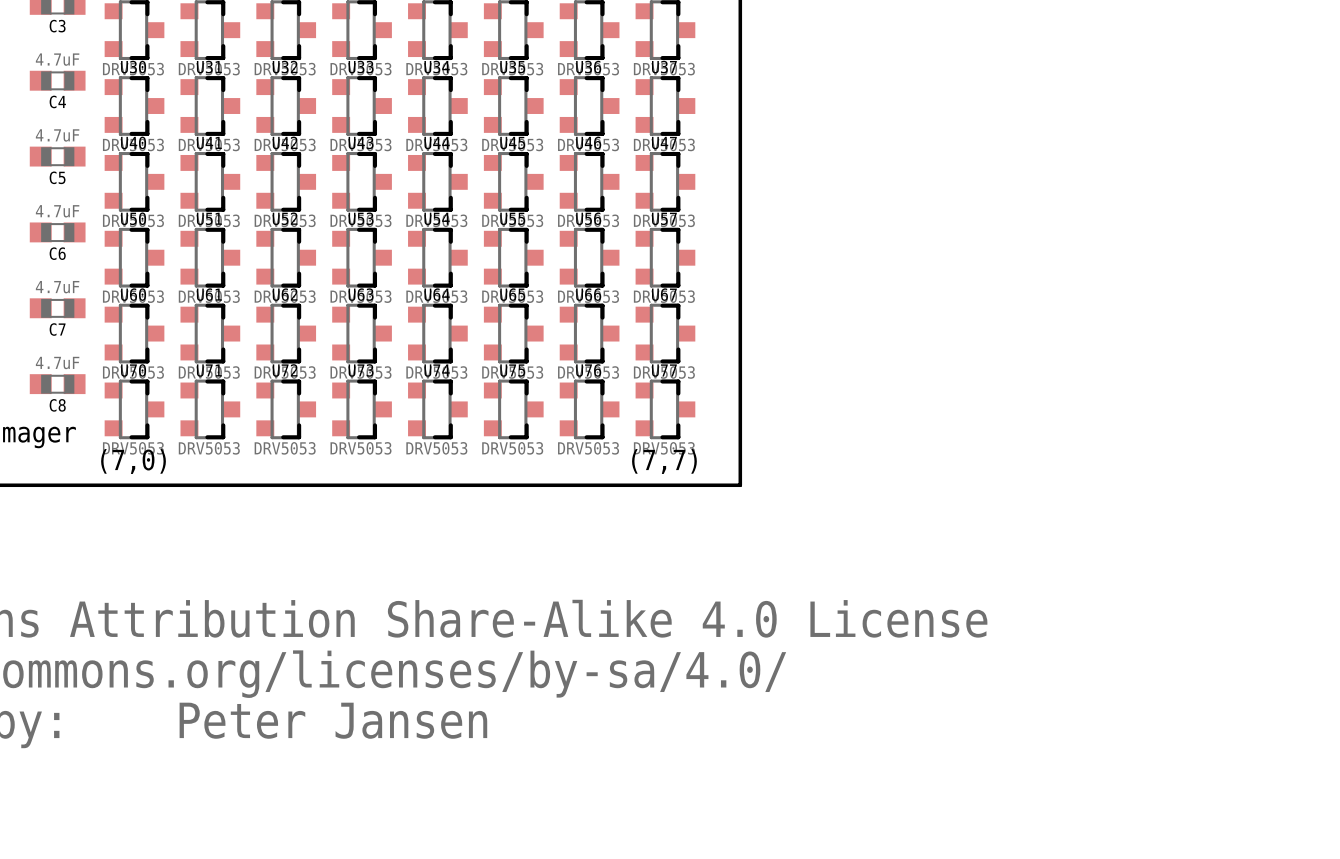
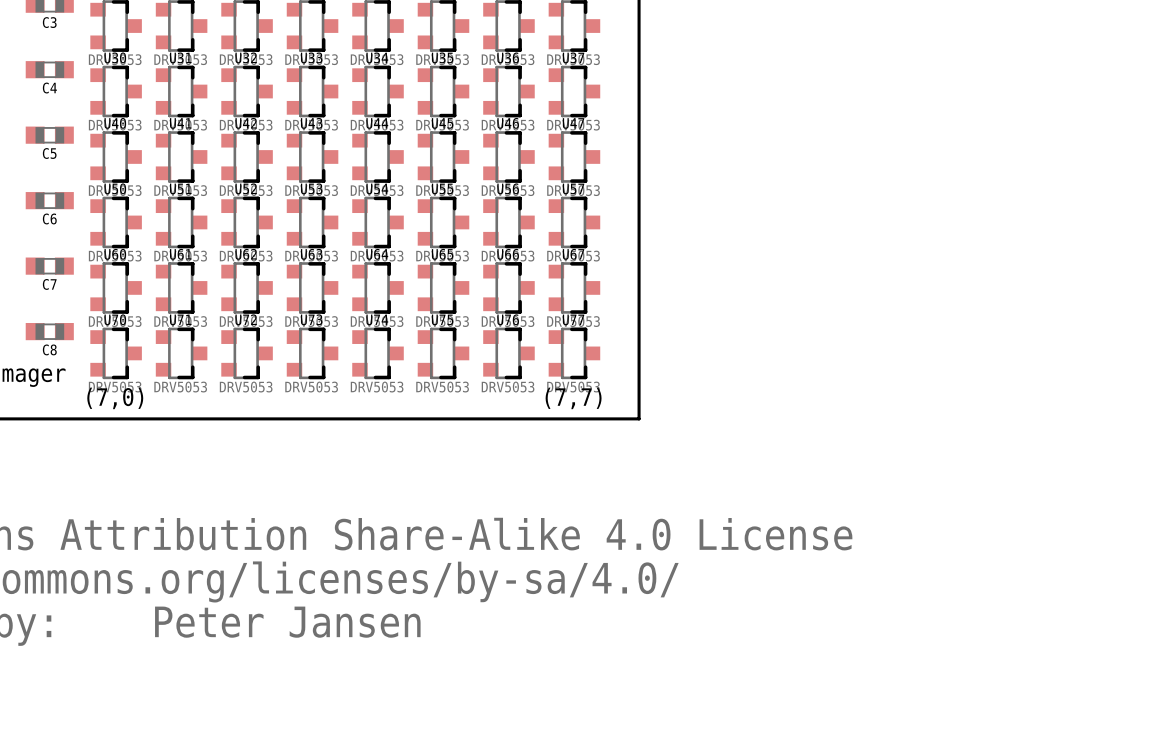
C4 value: 4.7uF (57, 59) -> none
C5 value: 4.7uF (57, 135) -> none
C6 value: 4.7uF (57, 211) -> none
C7 value: 4.7uF (57, 287) -> none
C8 value: 4.7uF (57, 363) -> none

